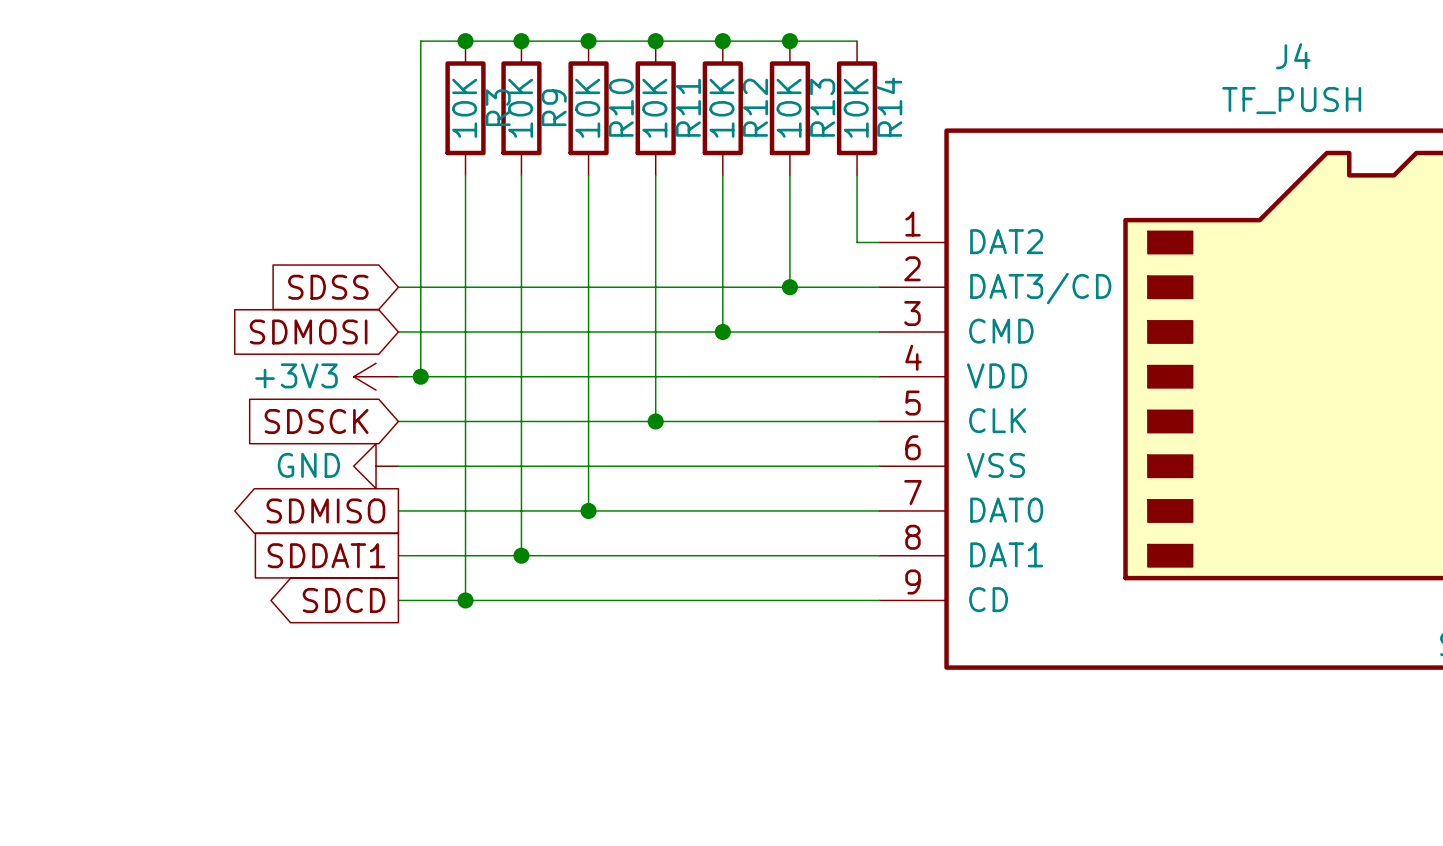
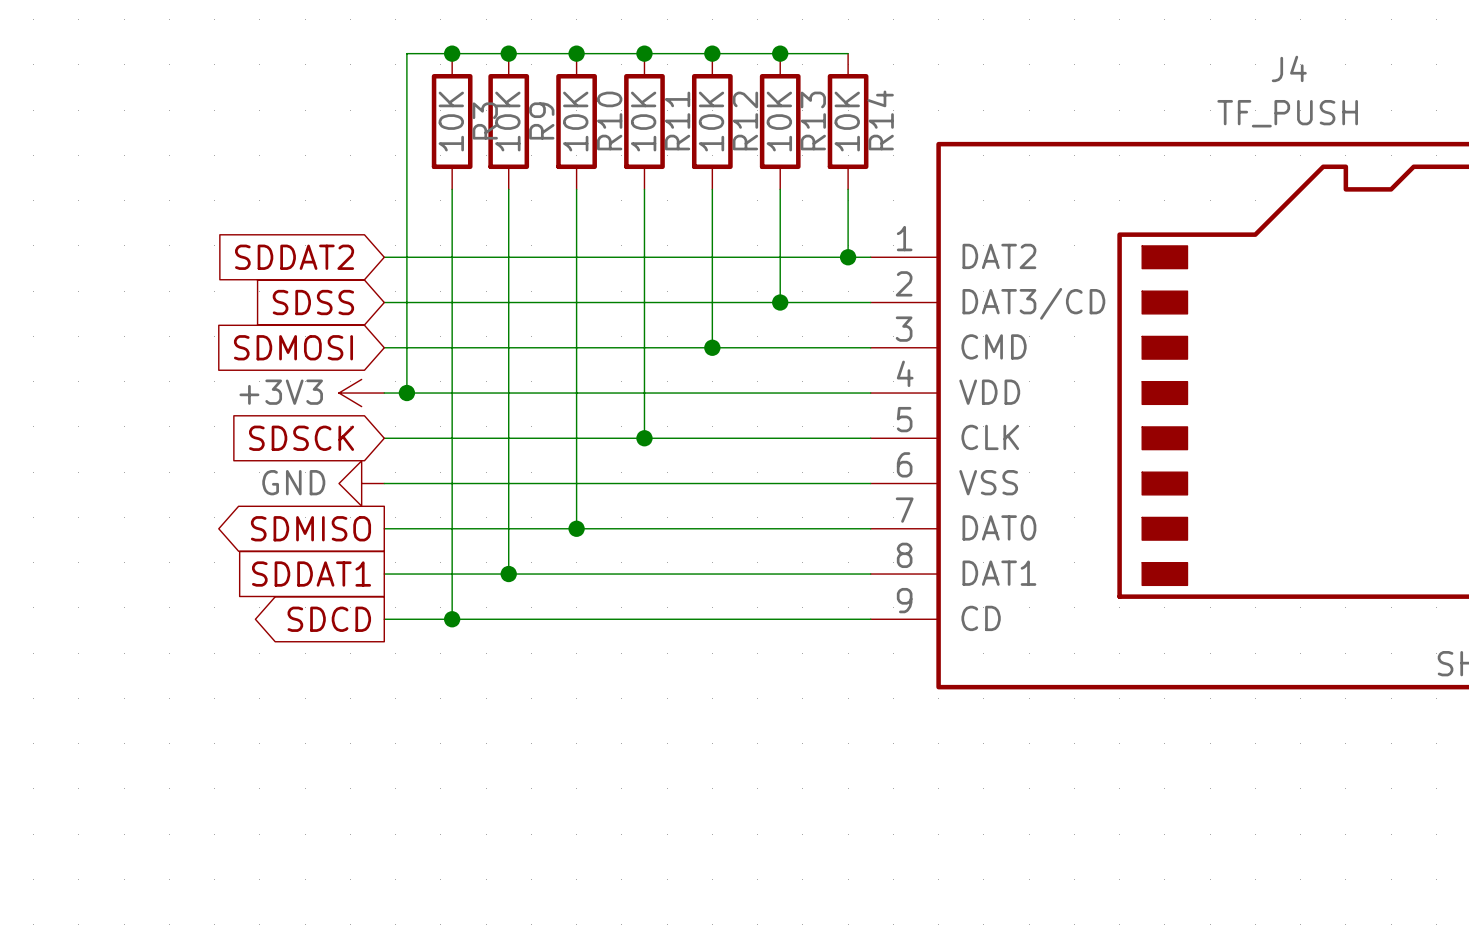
global label: none -> SDDAT2 (294, 257)
wire: none -> (384, 257) (848, 257)
junction: none -> (848, 257)

